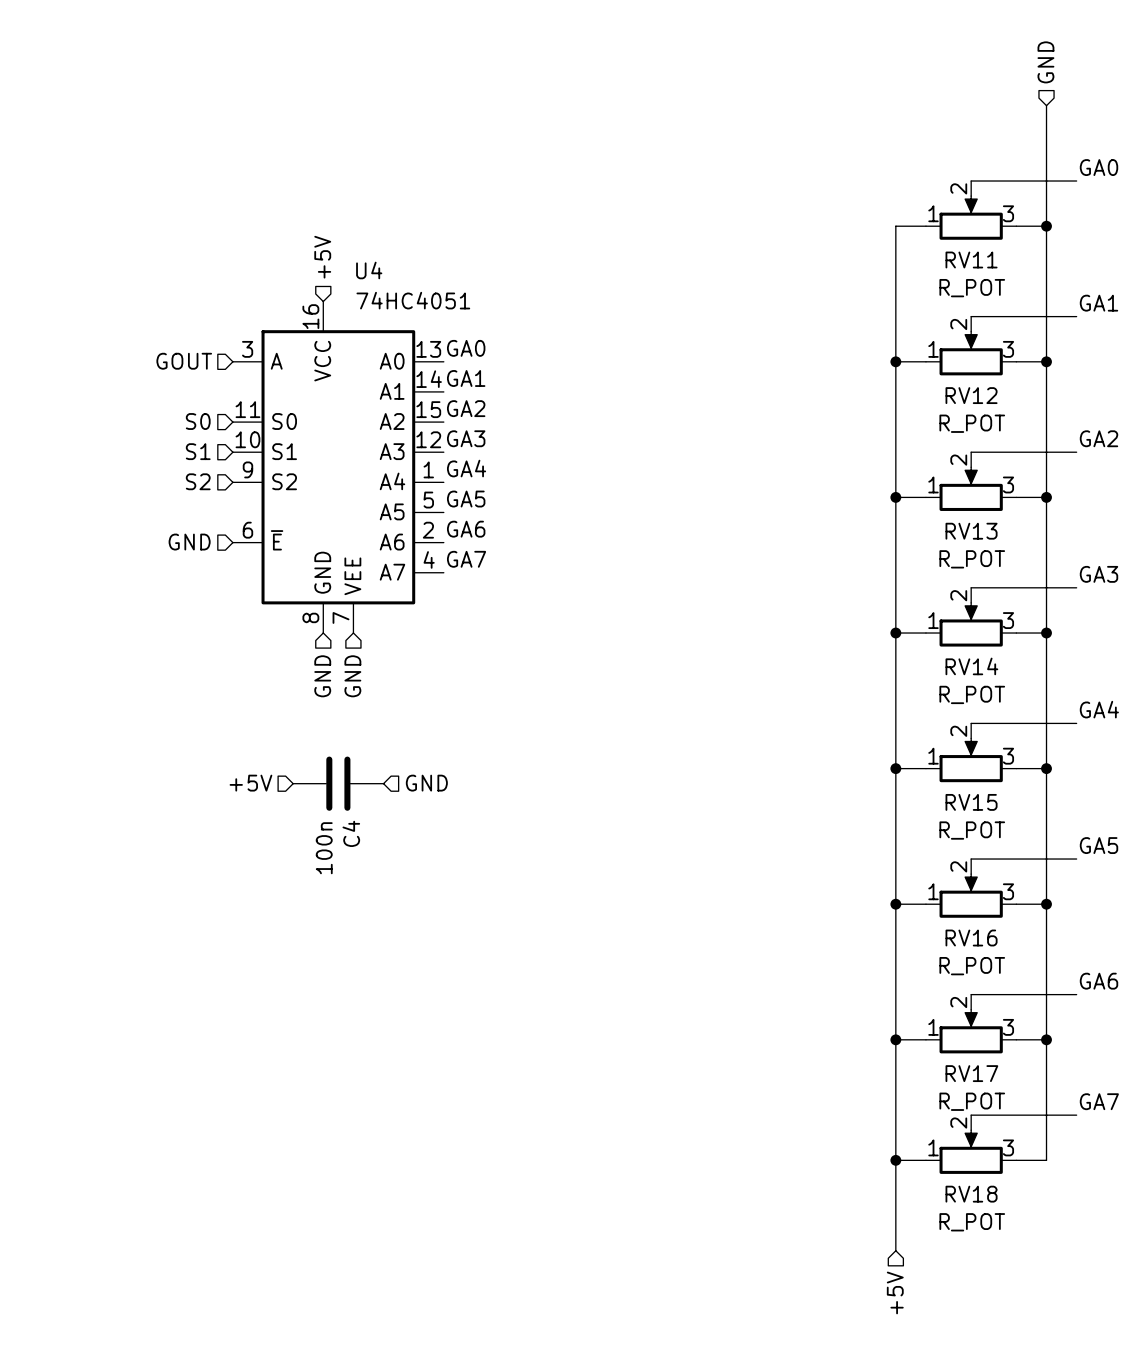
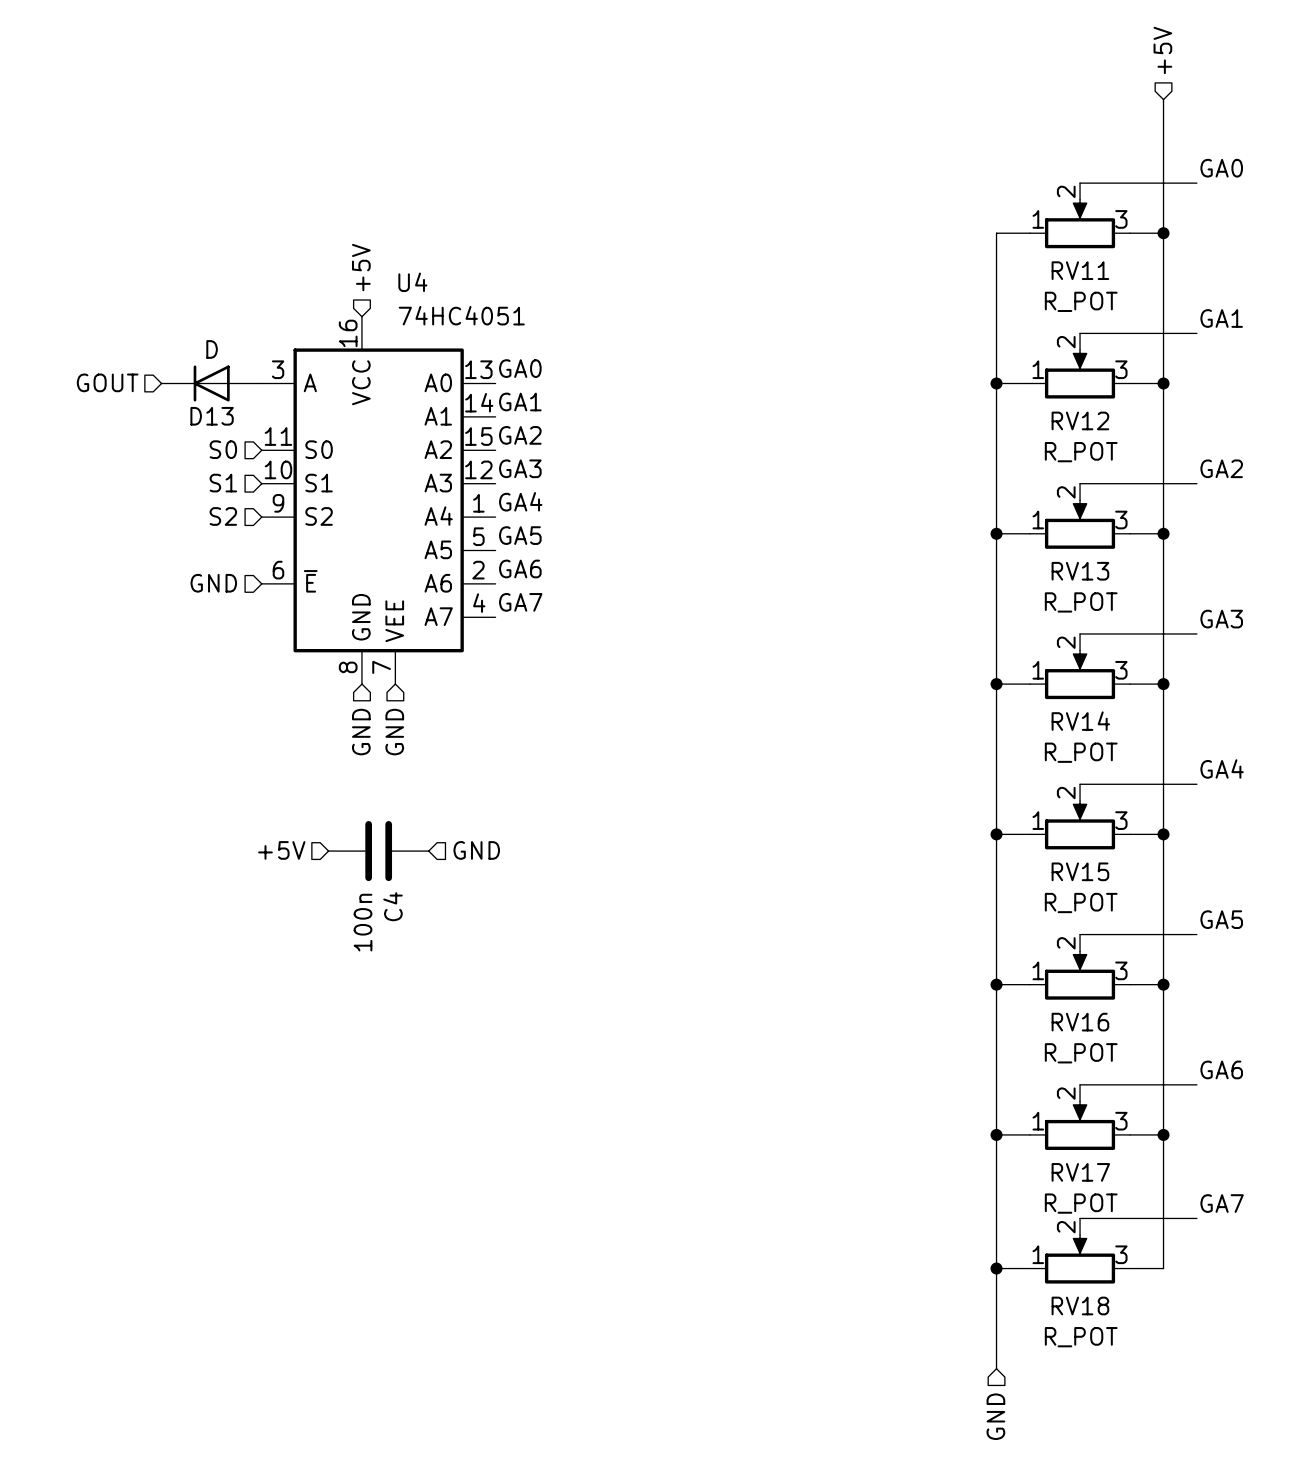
hierarchical label: GND (1045, 62) -> +5V (1162, 50)
hierarchical label position: GOUT (184, 361) -> GOUT (107, 382)
D13: none -> D (211, 383)
hierarchical label: +5V (895, 1292) -> GND (995, 1416)

